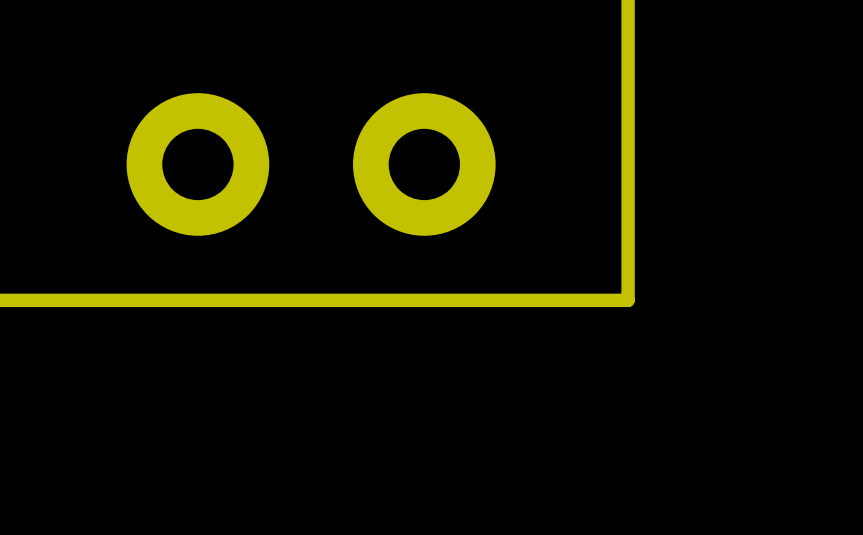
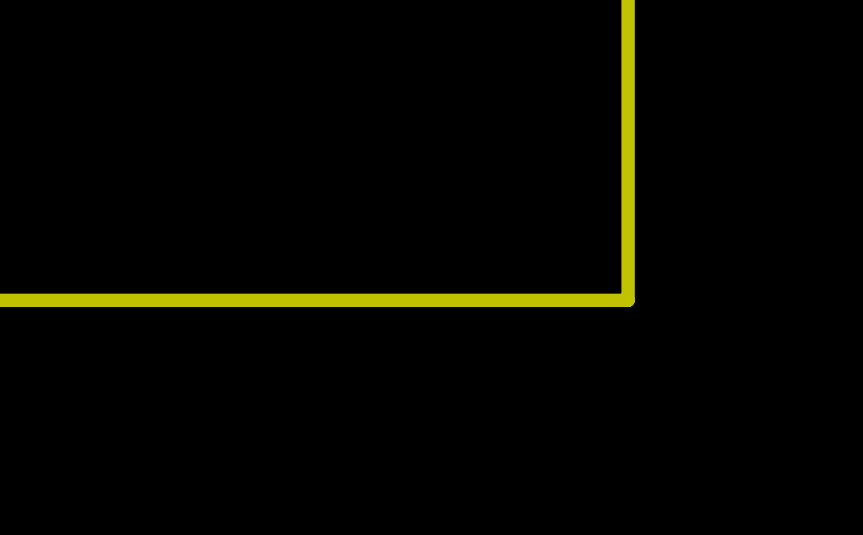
part: (311, 164) -> none

